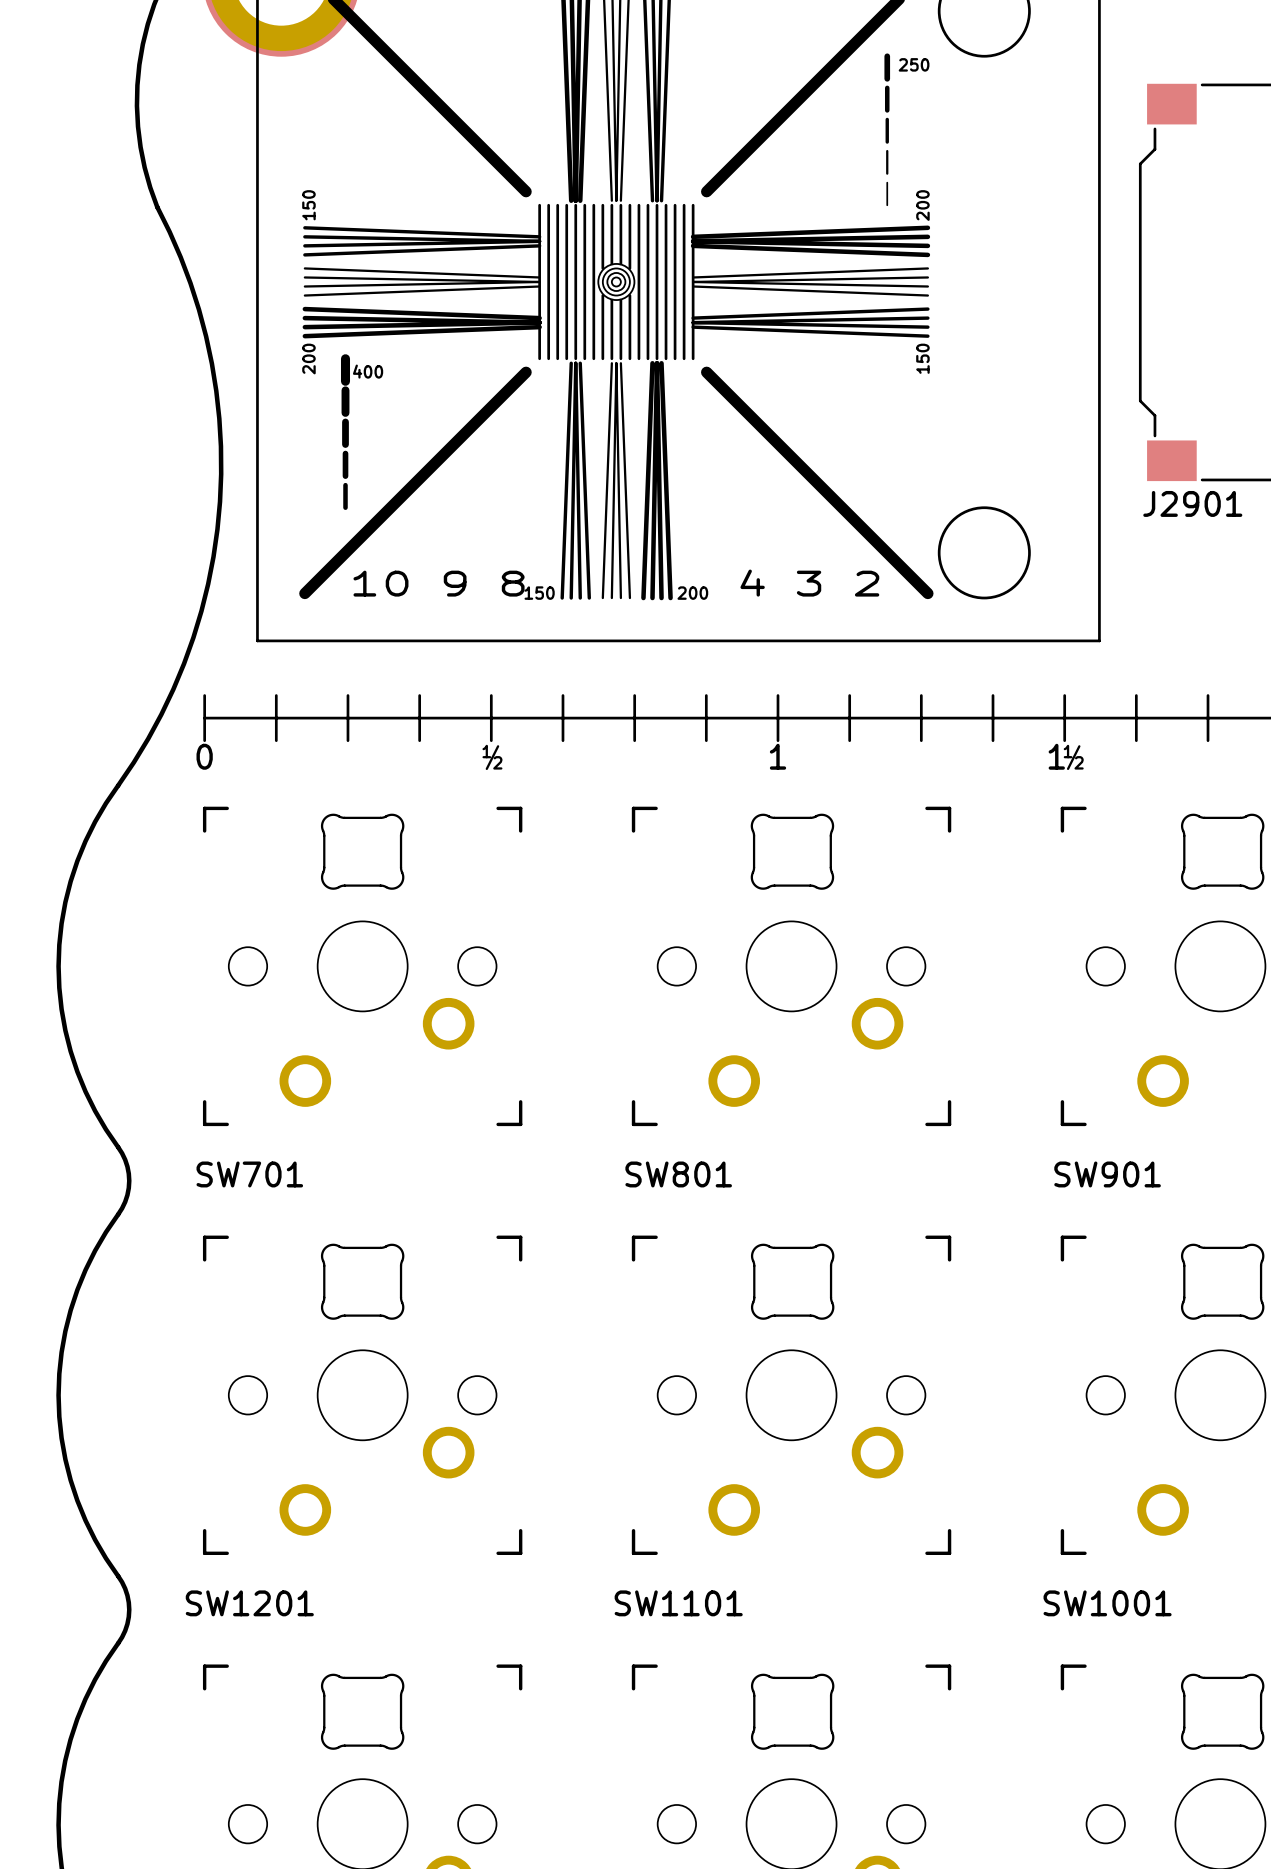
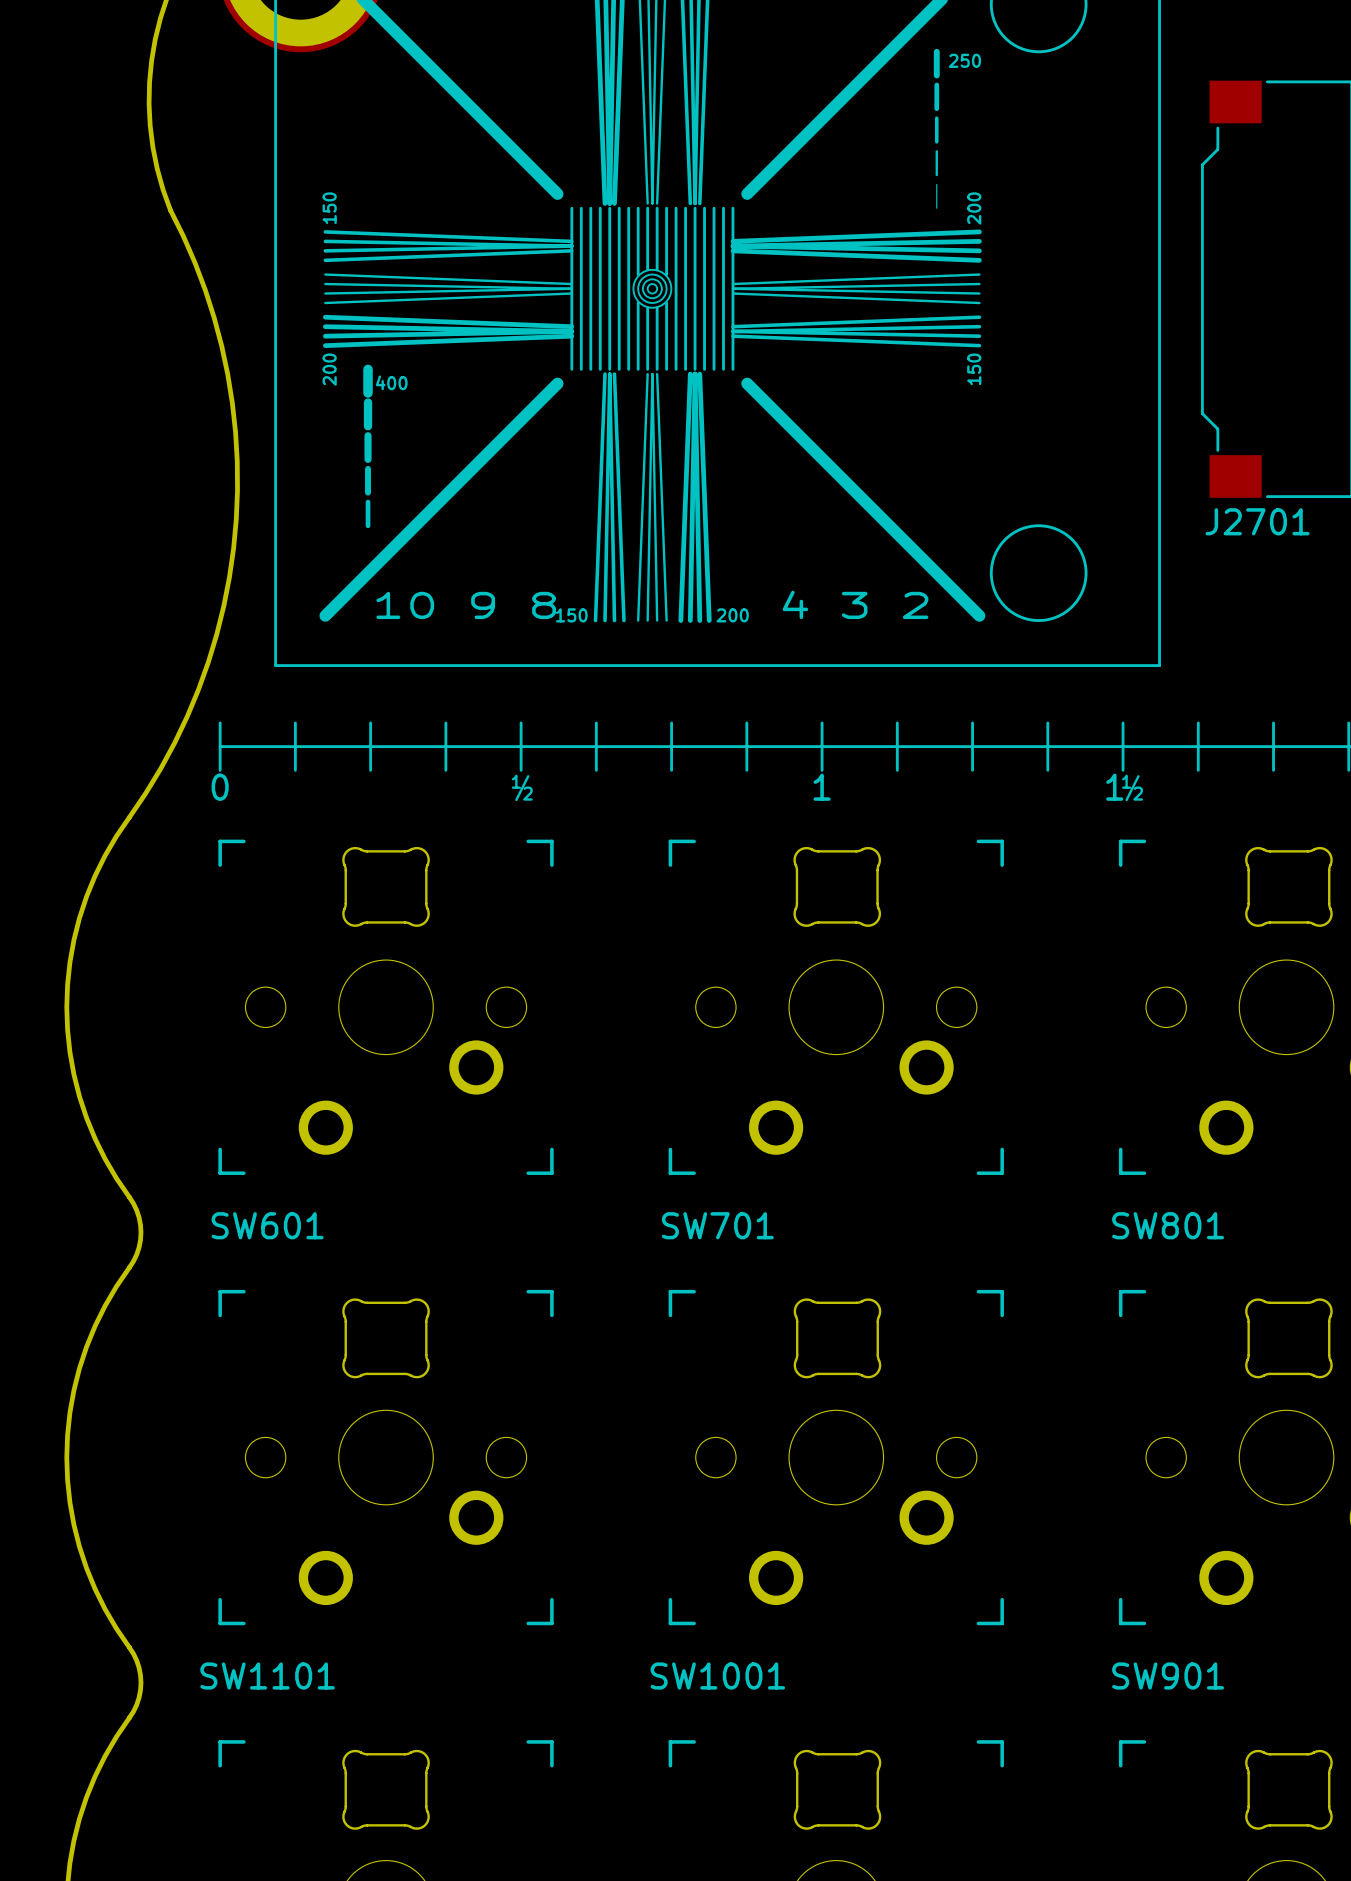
J2901 name: J2901 (1192, 503) -> J2701 (1257, 521)
SW701 name: SW701 (249, 1174) -> SW601 (267, 1225)
SW801 name: SW801 (678, 1174) -> SW701 (717, 1225)
SW901 name: SW901 (1107, 1174) -> SW801 (1168, 1225)
SW1201 name: SW1201 (249, 1603) -> SW1101 (267, 1676)
SW1101 name: SW1101 (678, 1603) -> SW1001 (717, 1676)
SW1001 name: SW1001 (1107, 1603) -> SW901 (1168, 1676)

